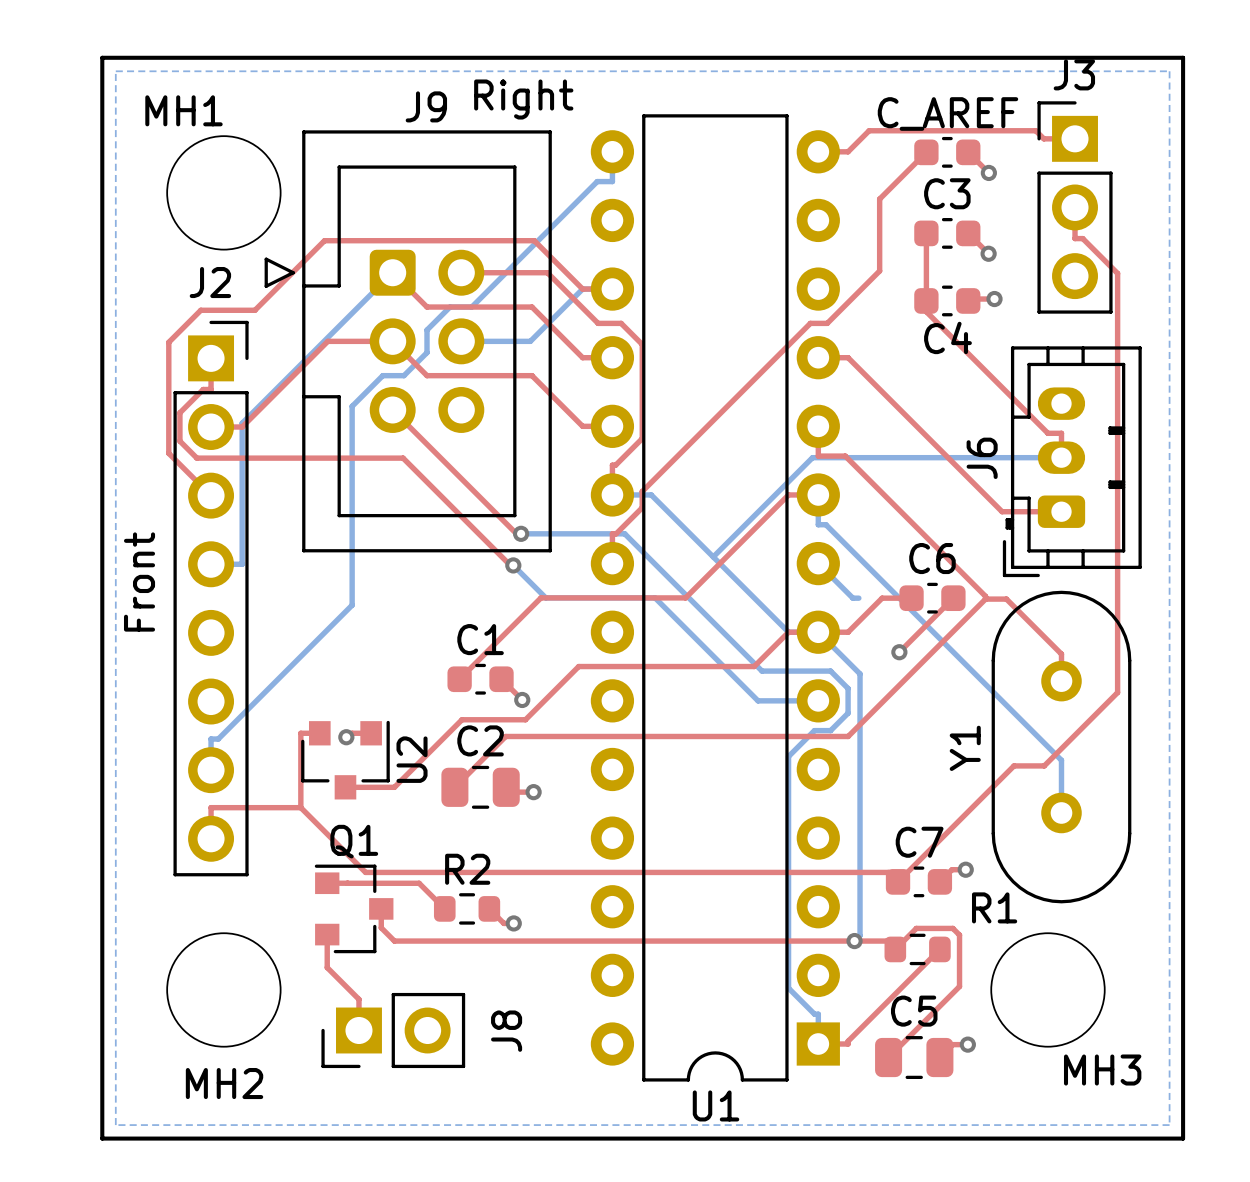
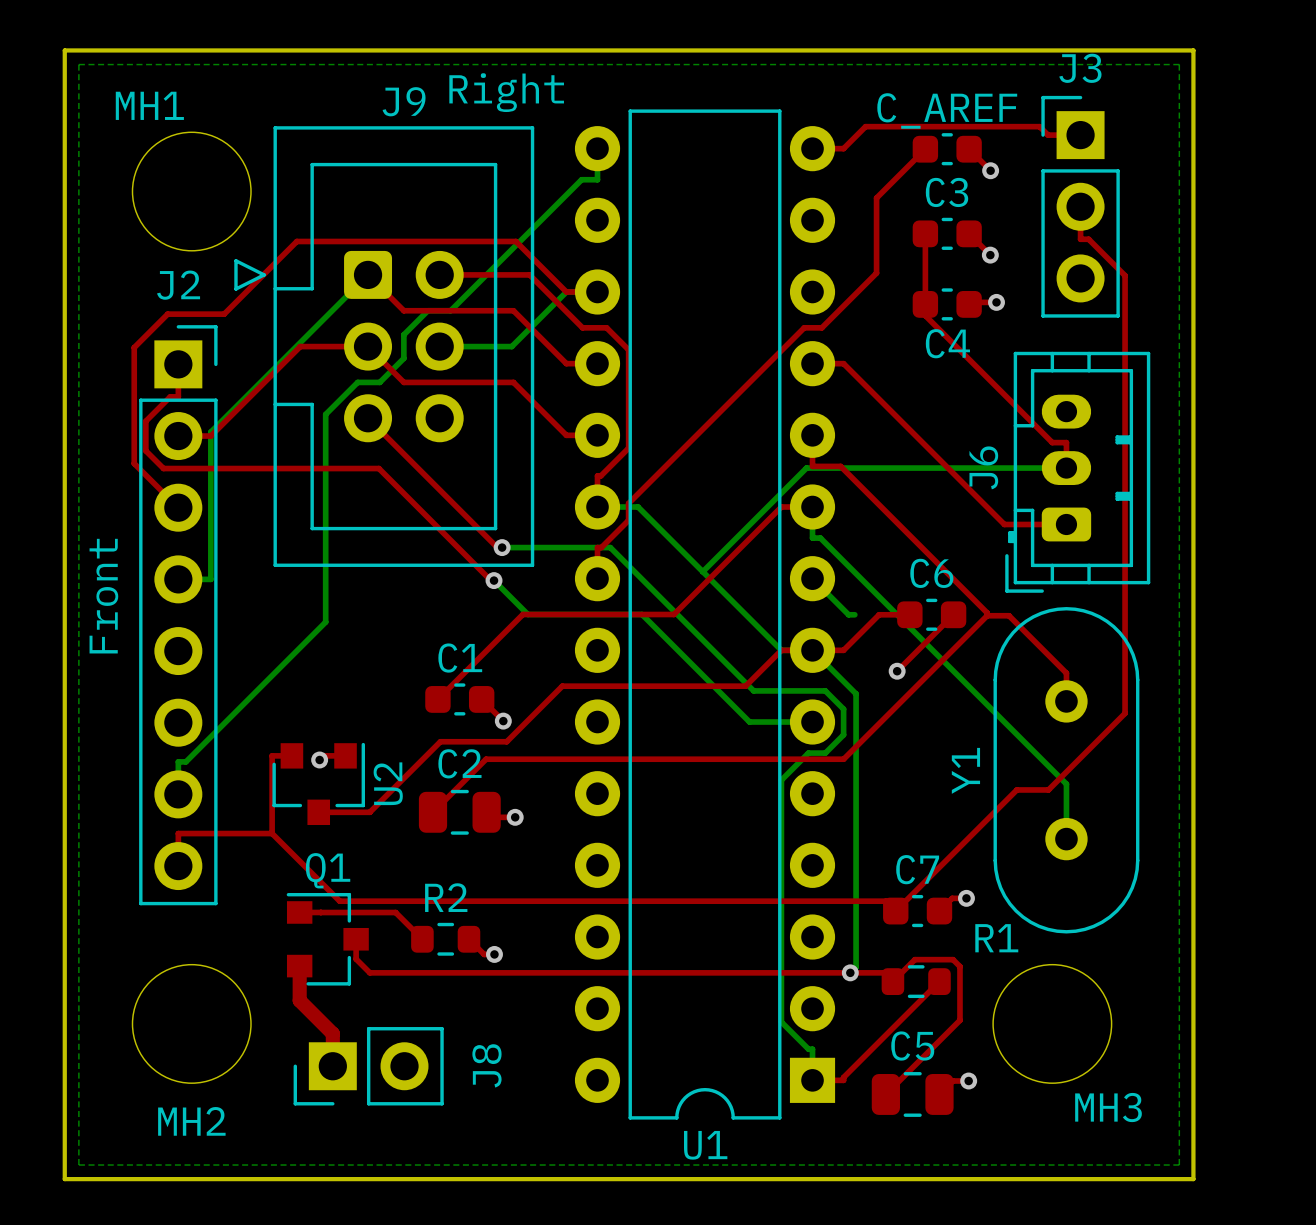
top track width: thin (327, 934) (327, 967) (358, 999) (358, 1030) -> thick (299, 966) (299, 1000) (332, 1033) (332, 1066)

